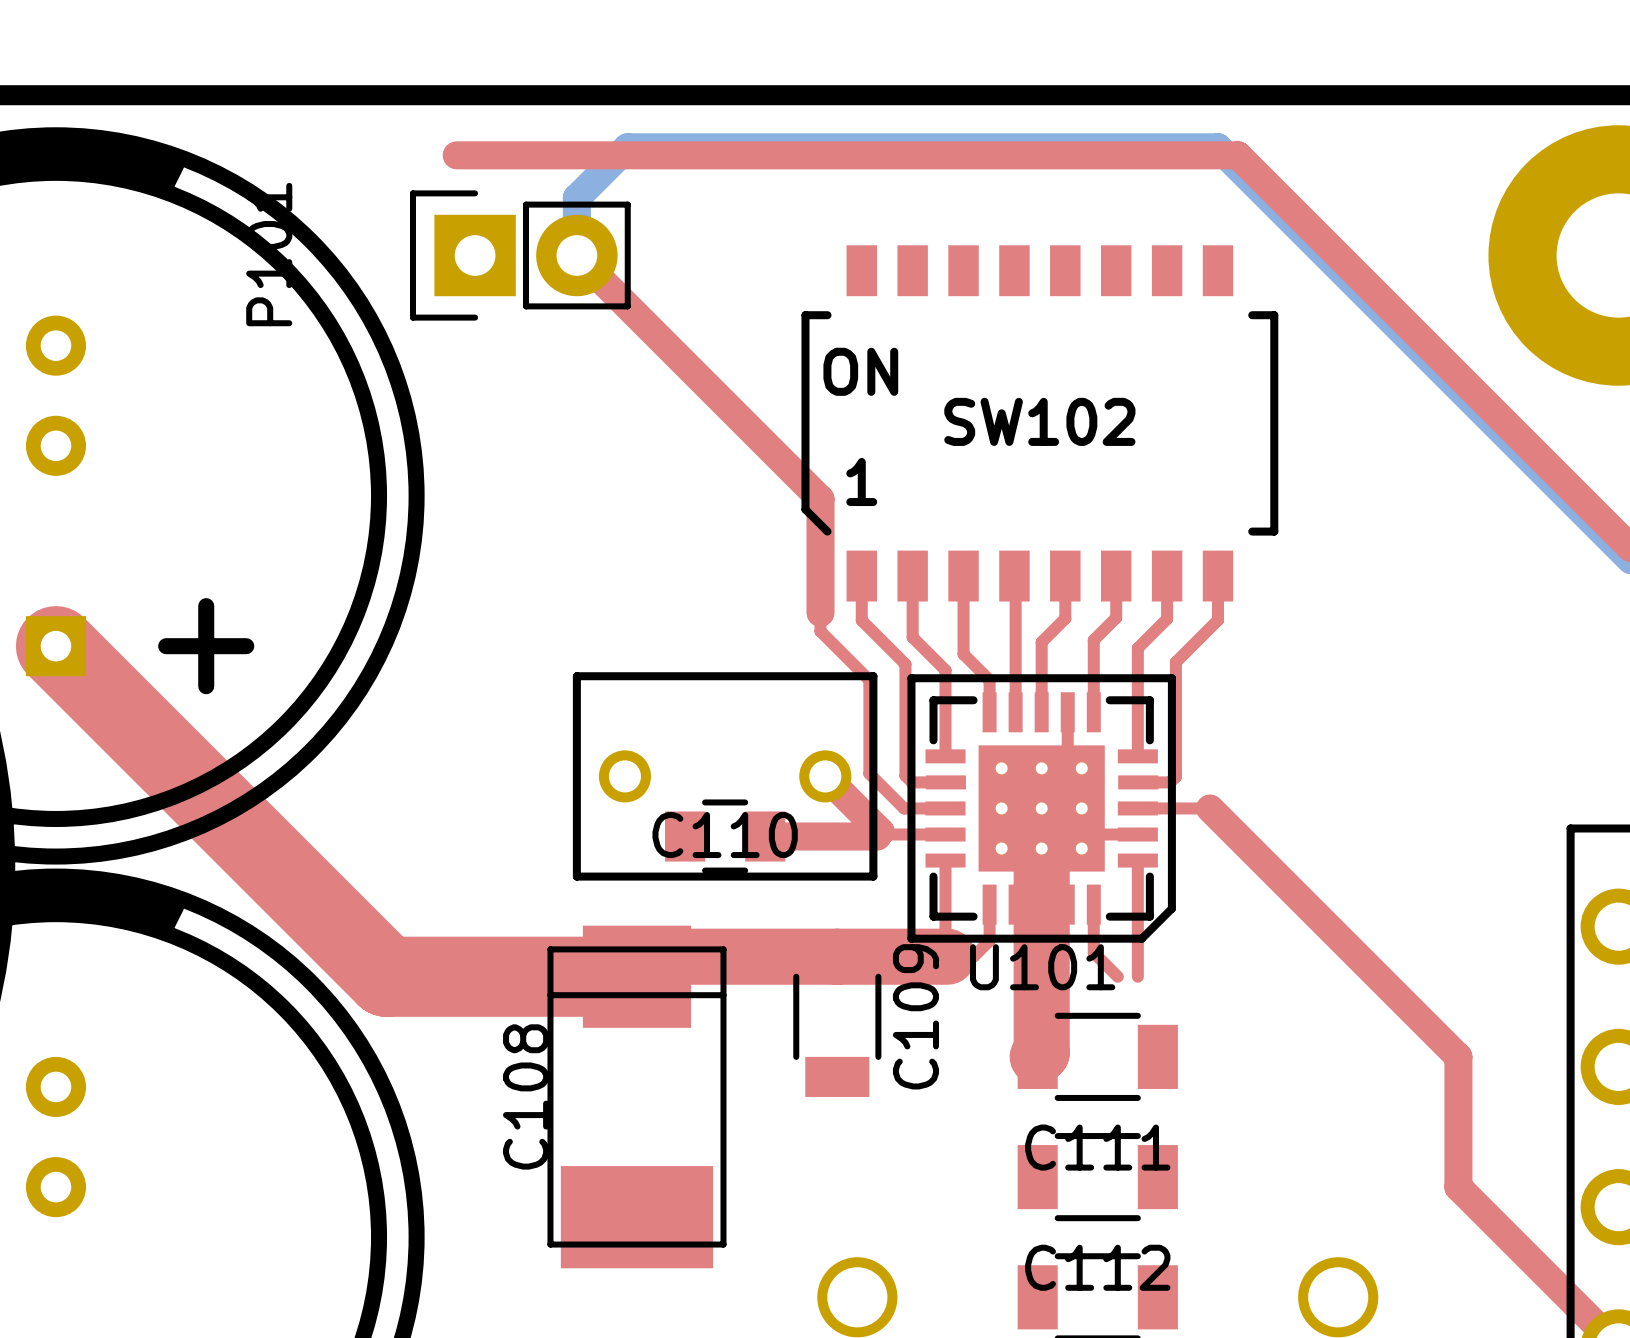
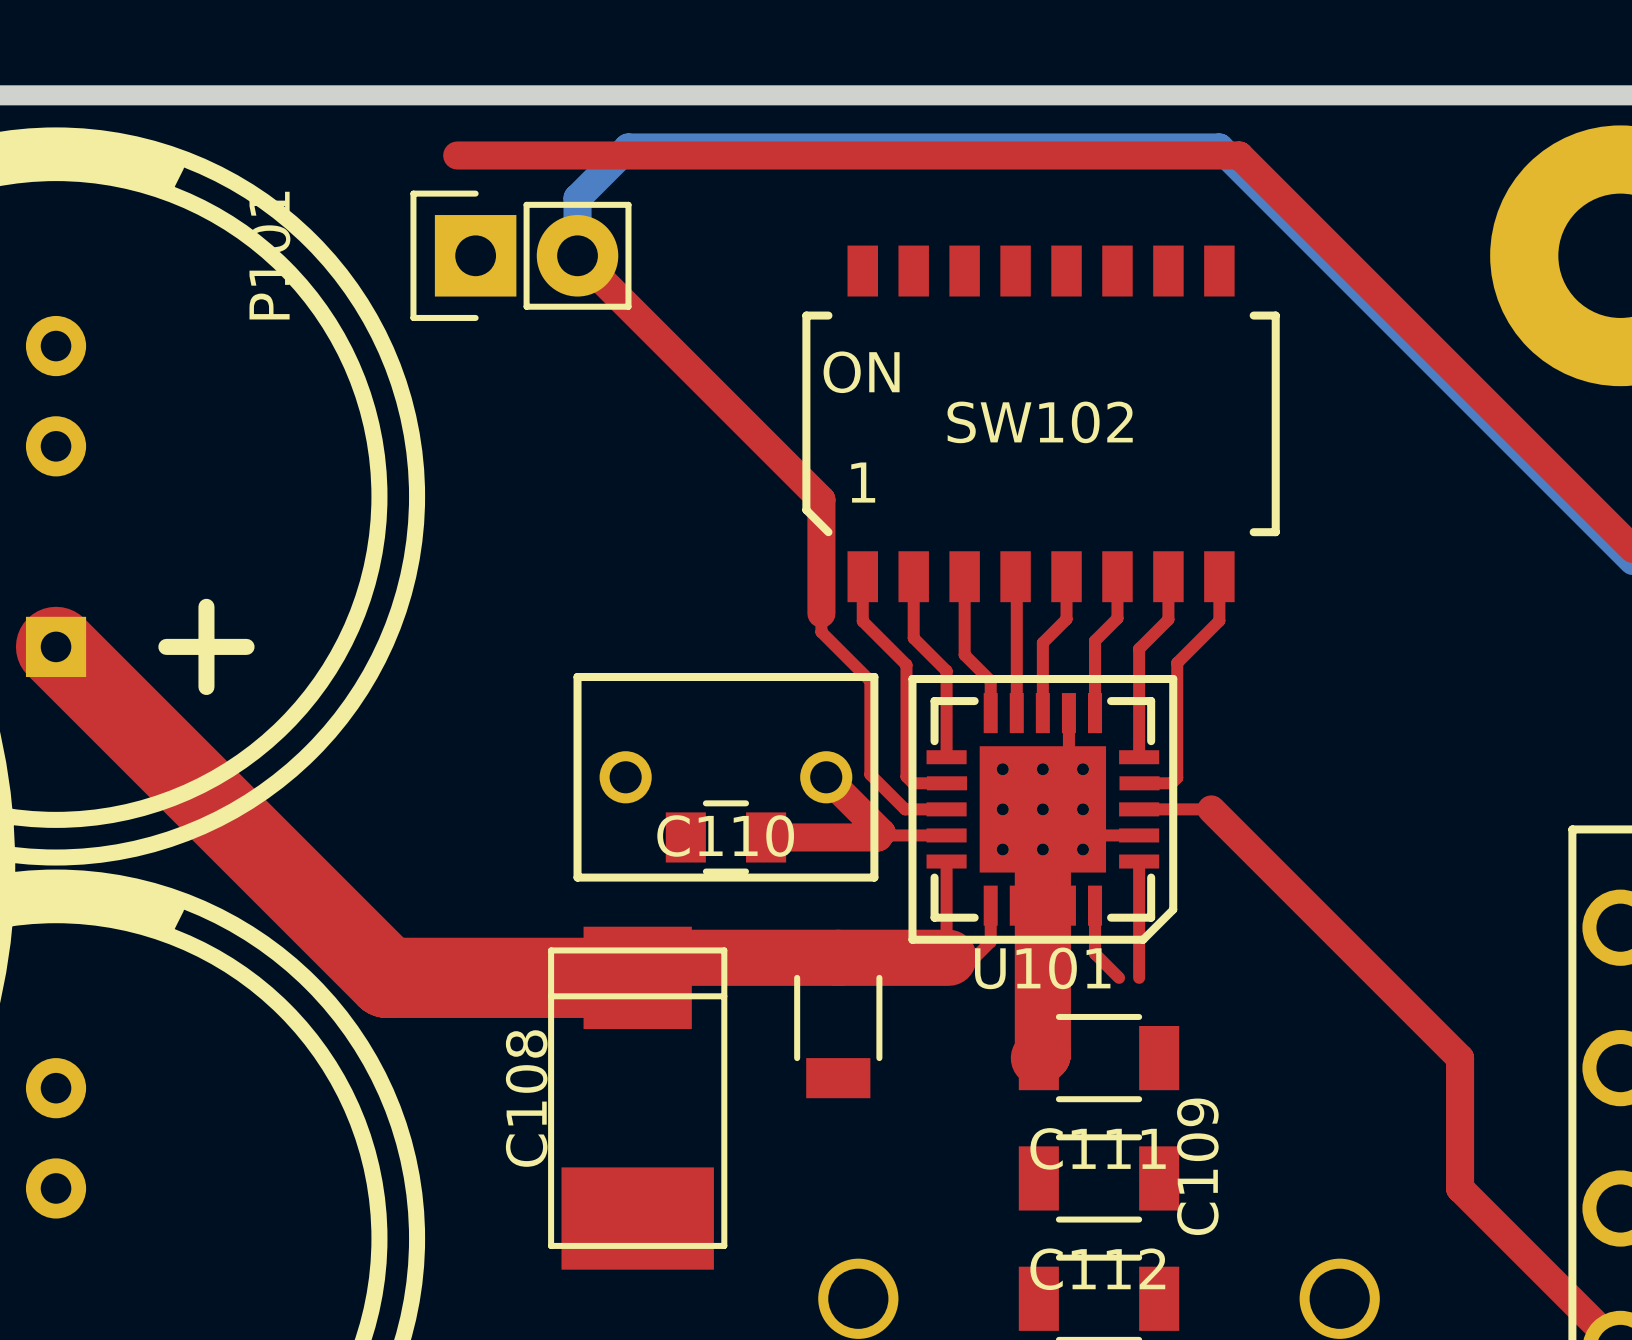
C109 name position: C109 (915, 1016) -> C109 (1197, 1166)

